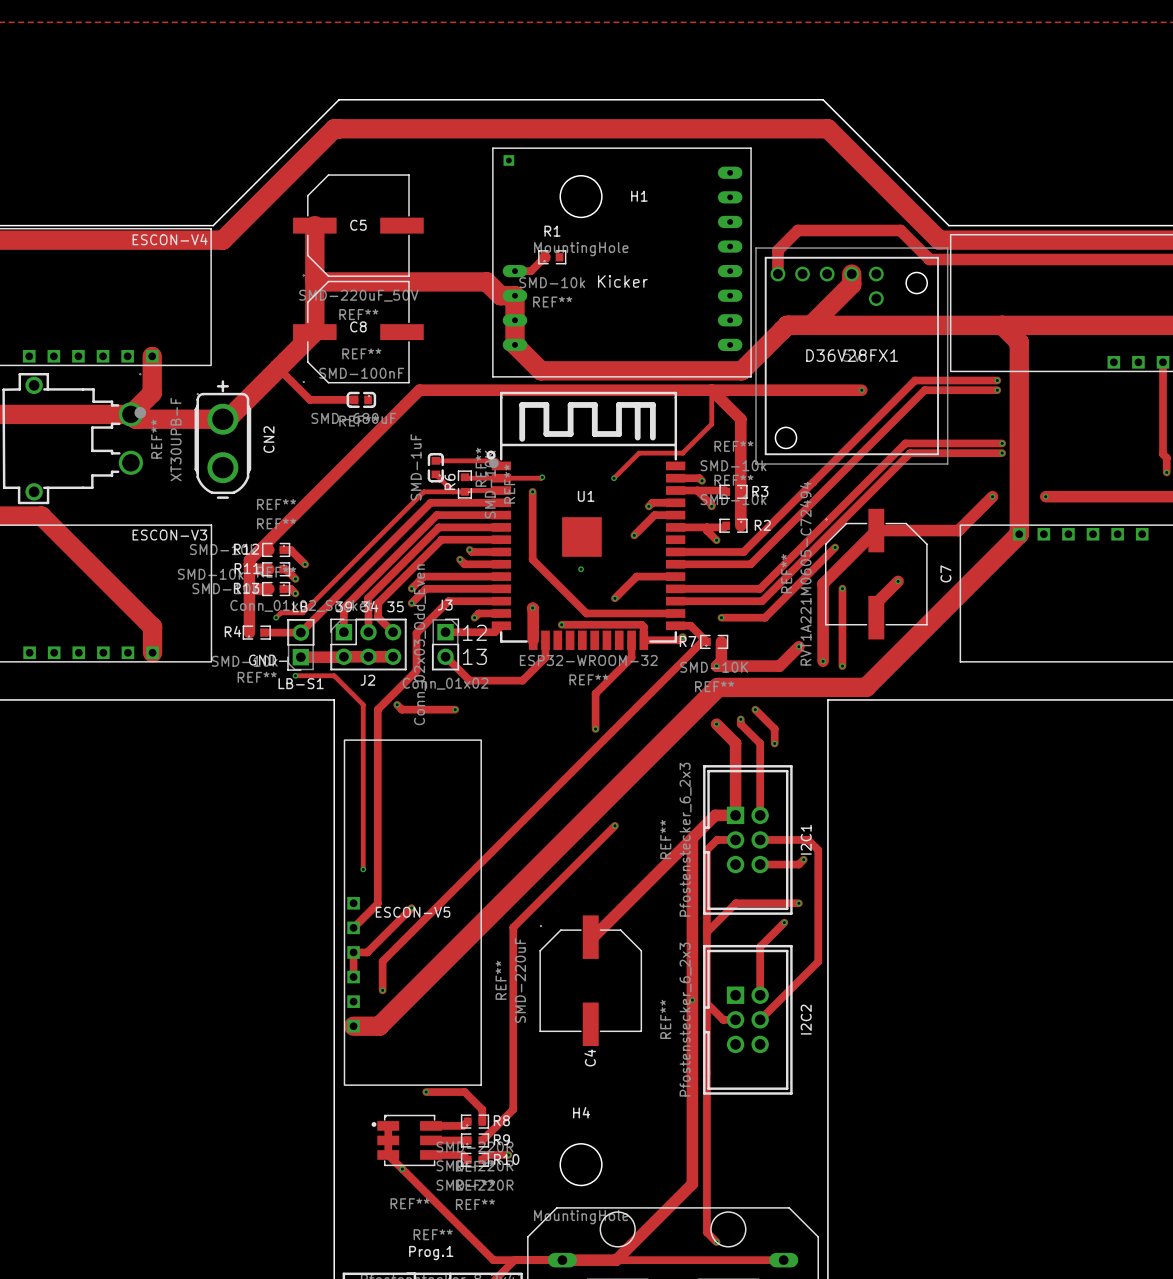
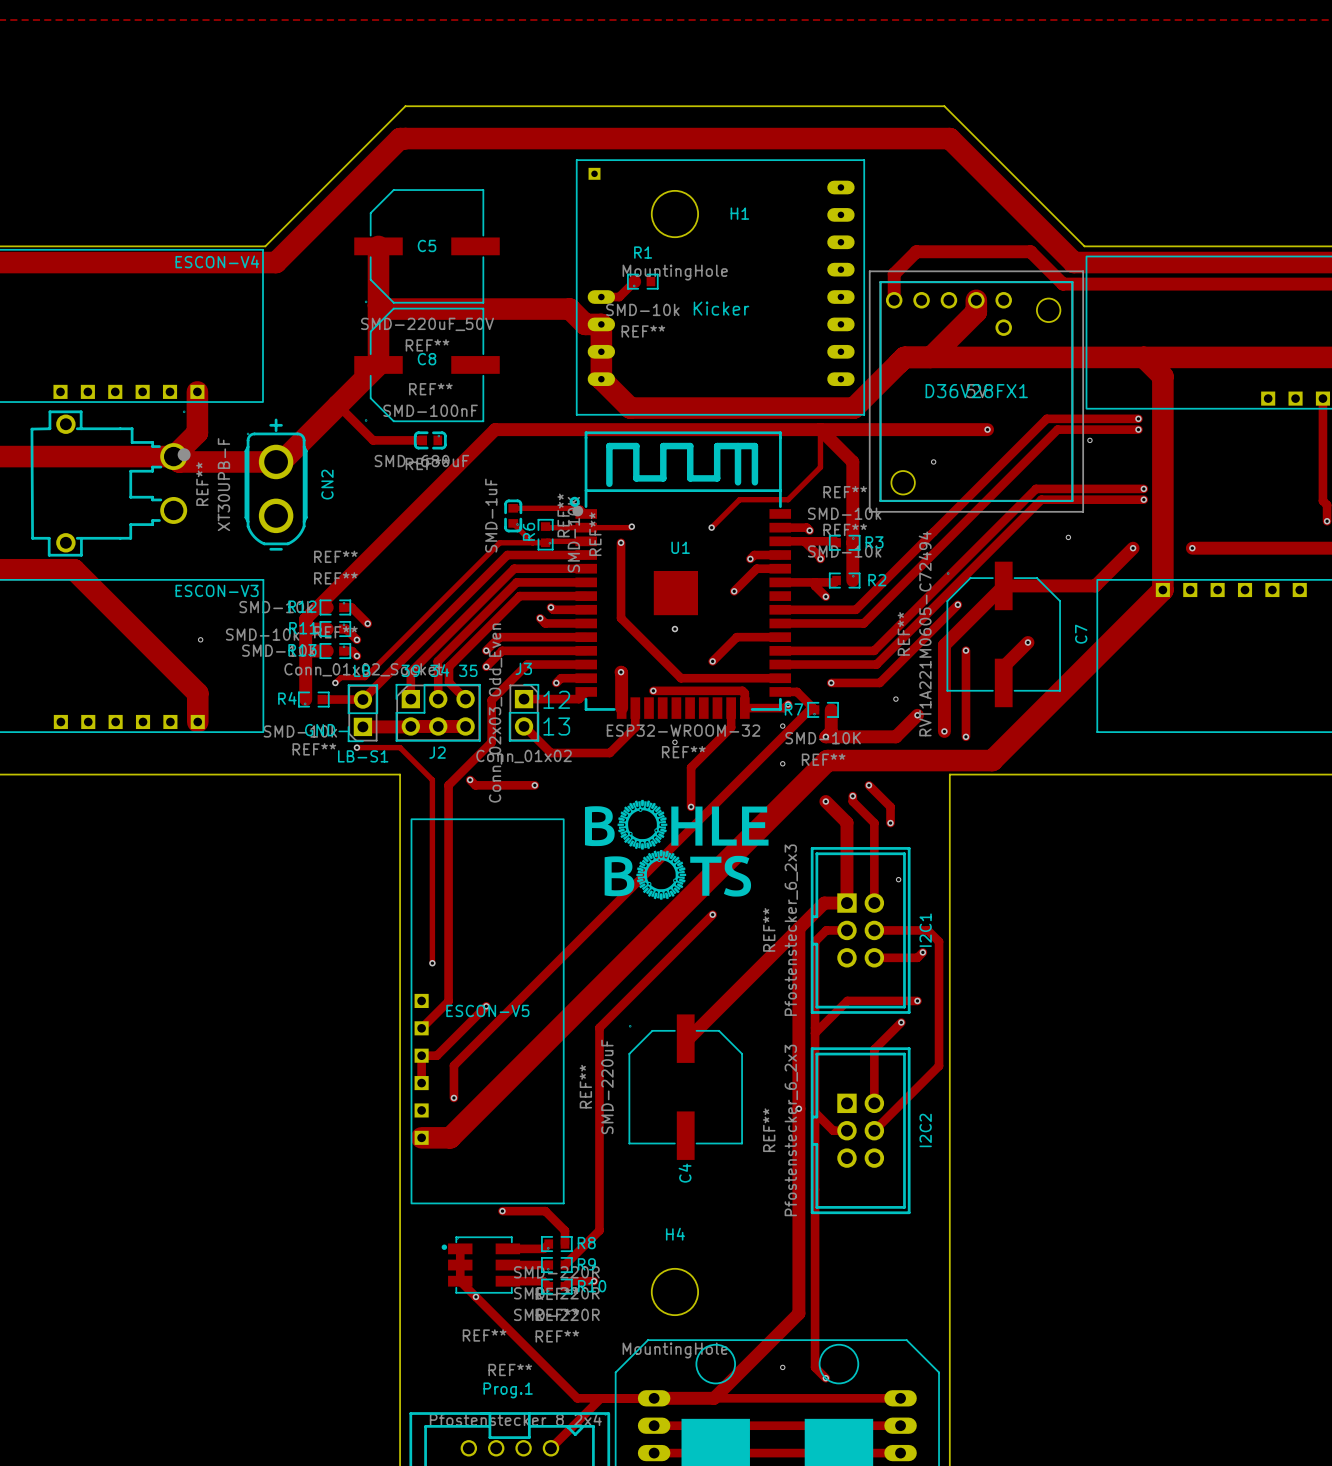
via: none -> (1089, 440)
via: none -> (933, 461)
via: none -> (1068, 537)
via: none -> (200, 639)
via: none -> (895, 699)
via: none -> (782, 726)
via: none -> (674, 742)
via: none -> (782, 763)
drawing: none -> [584, 799, 769, 900]
via: none -> (898, 879)
via: none -> (782, 1367)

